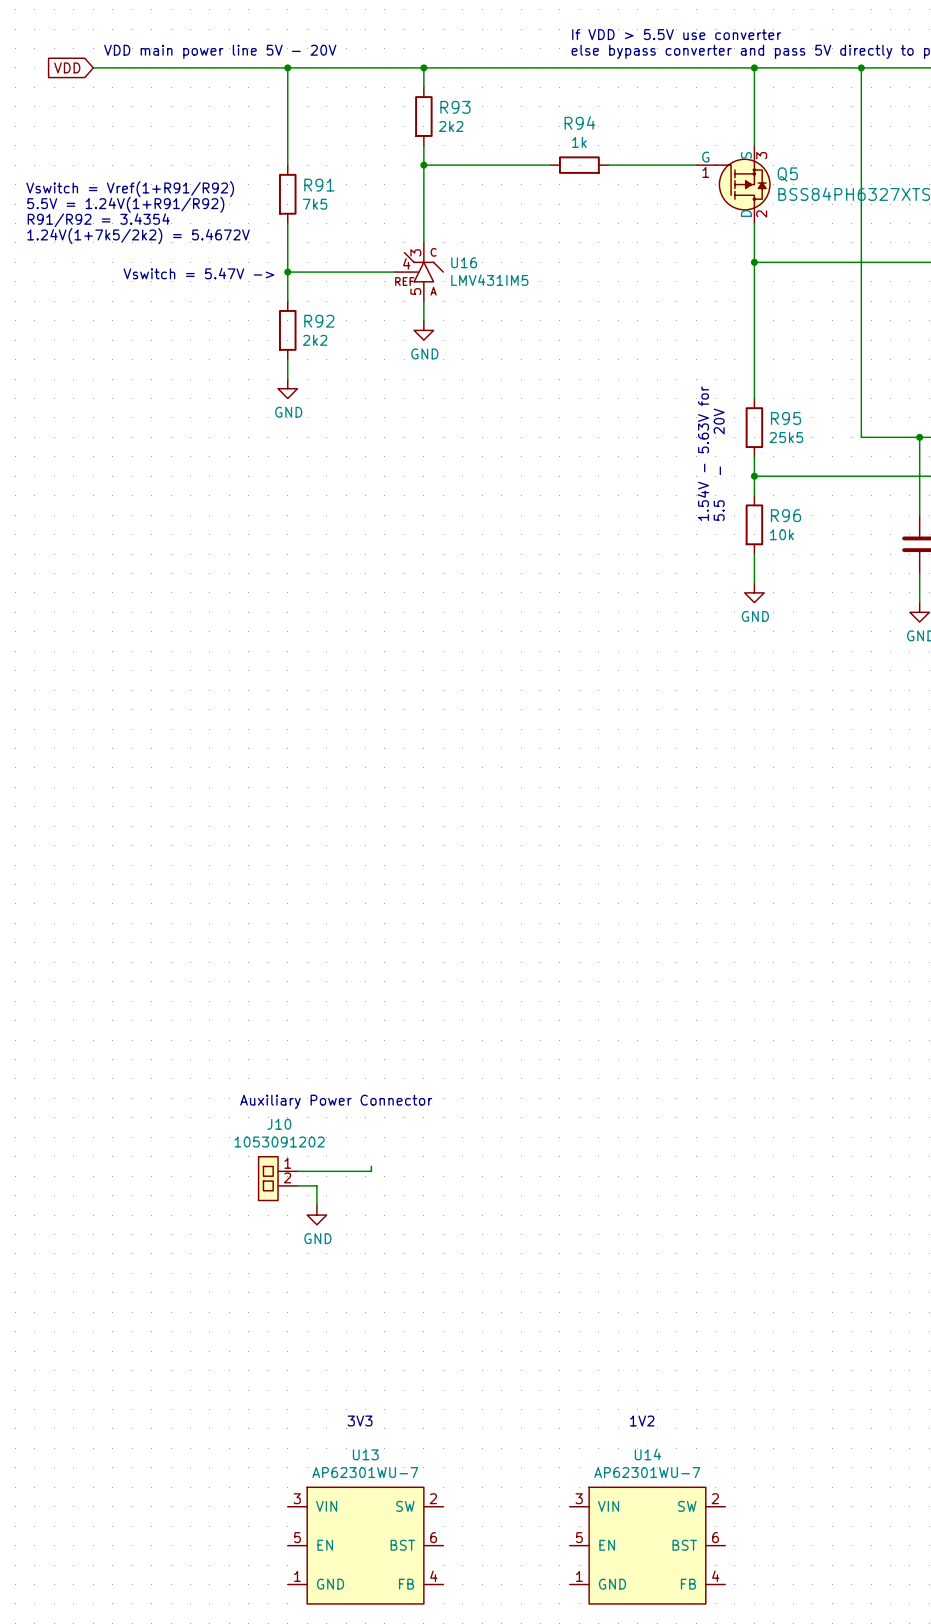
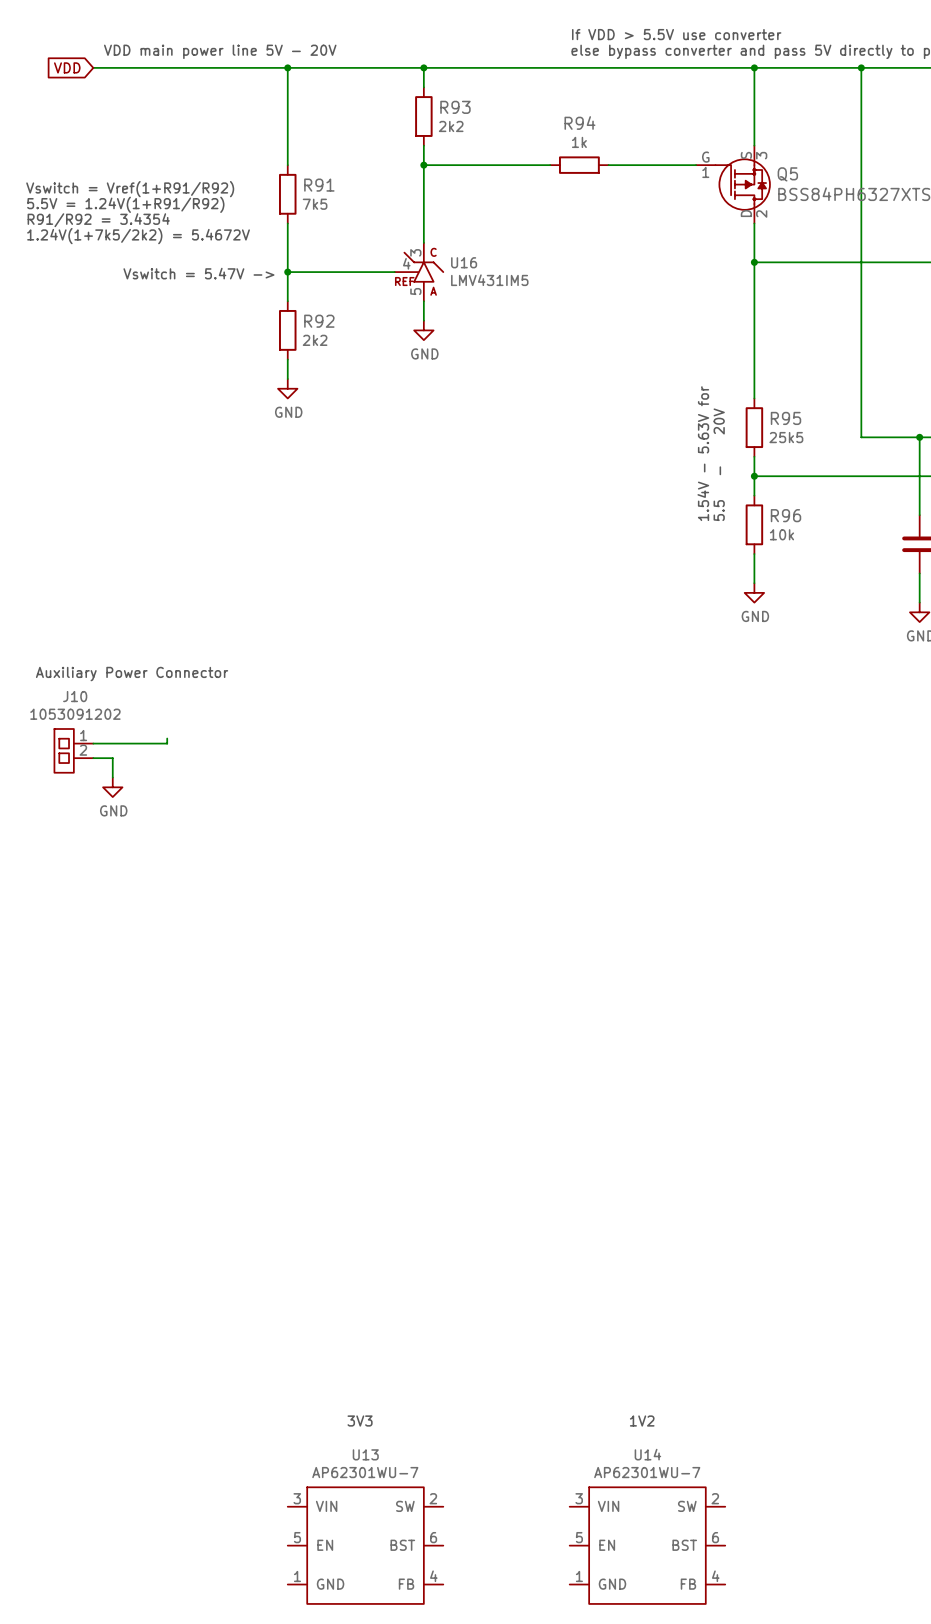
text: none -> Auxiliary Power Connector (132, 674)
wire: none -> (167, 738) (167, 743) (93, 743)
wire: none -> (93, 758) (112, 758) (112, 777)
power symbol: none -> GND (112, 787)
text: Auxiliary Power Connector (336, 1101) -> none
wire: (371, 1166) (371, 1171) (297, 1171) -> none
J10 position: (278, 1178) -> (73, 750)
wire: (297, 1185) (316, 1185) (316, 1205) -> none
power symbol: GND (316, 1215) -> none

